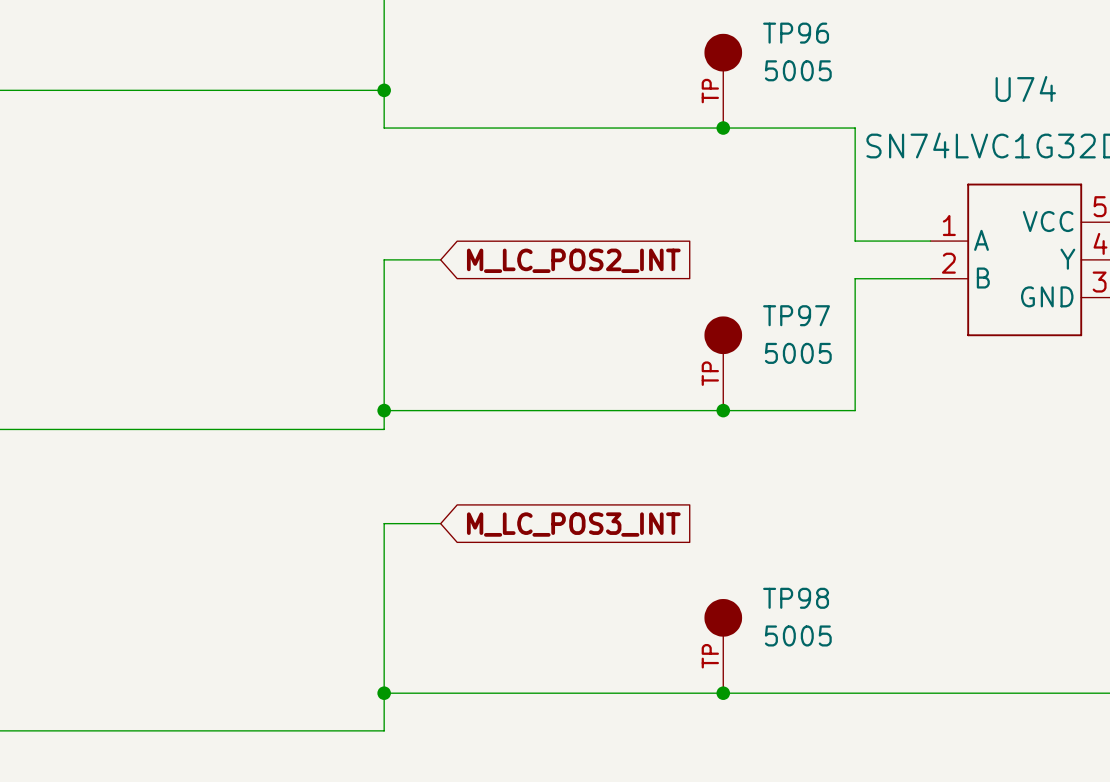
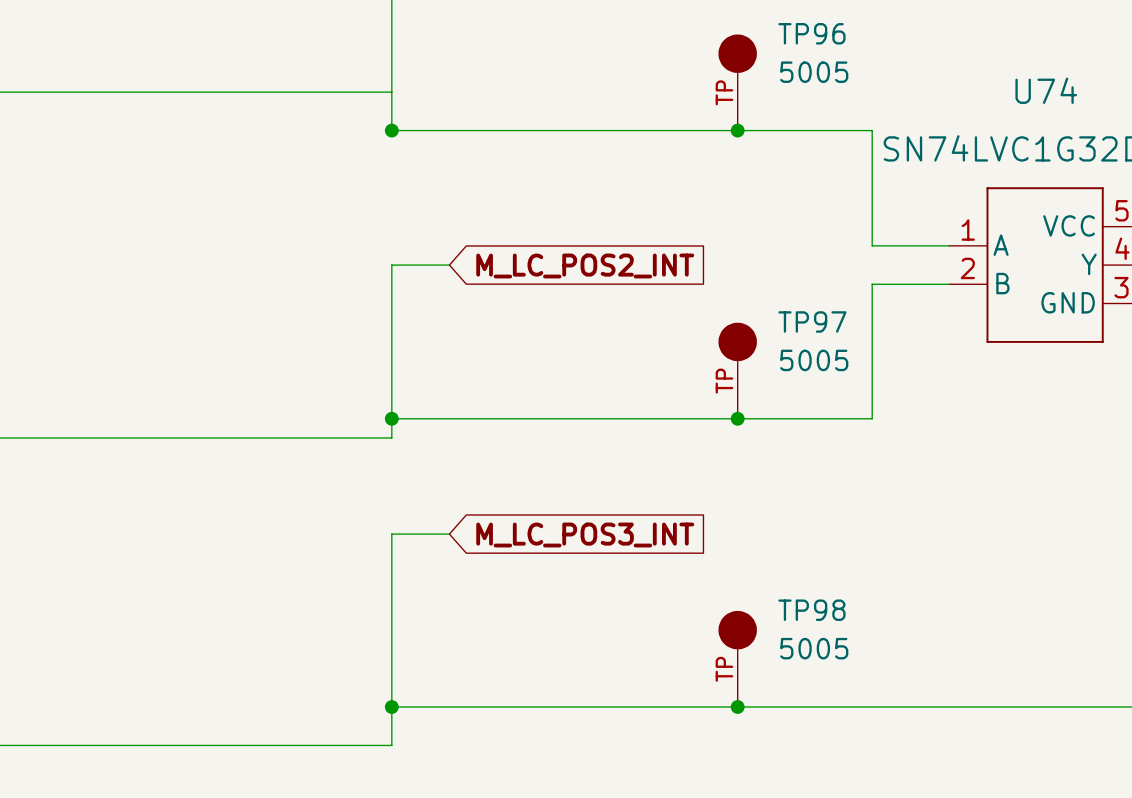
junction position: (384, 90) -> (391, 130)

